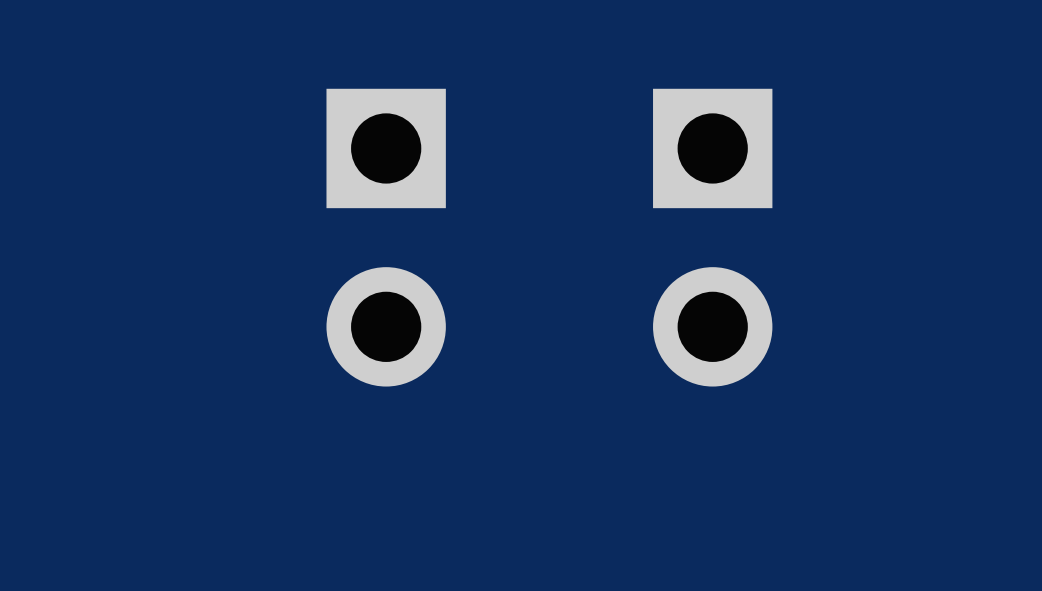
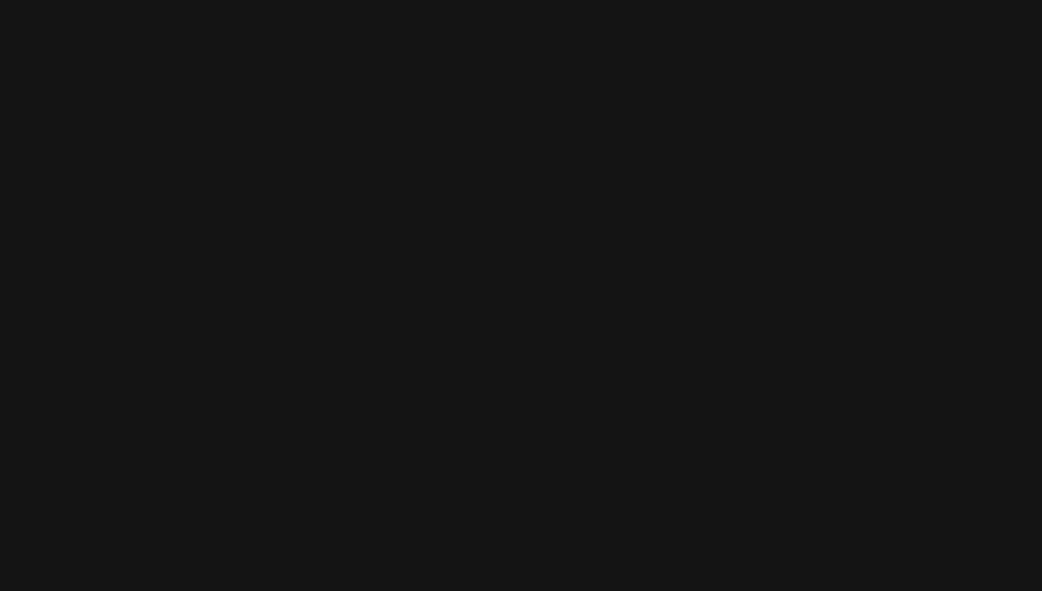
part: (386, 237) -> none
part: (712, 237) -> none

